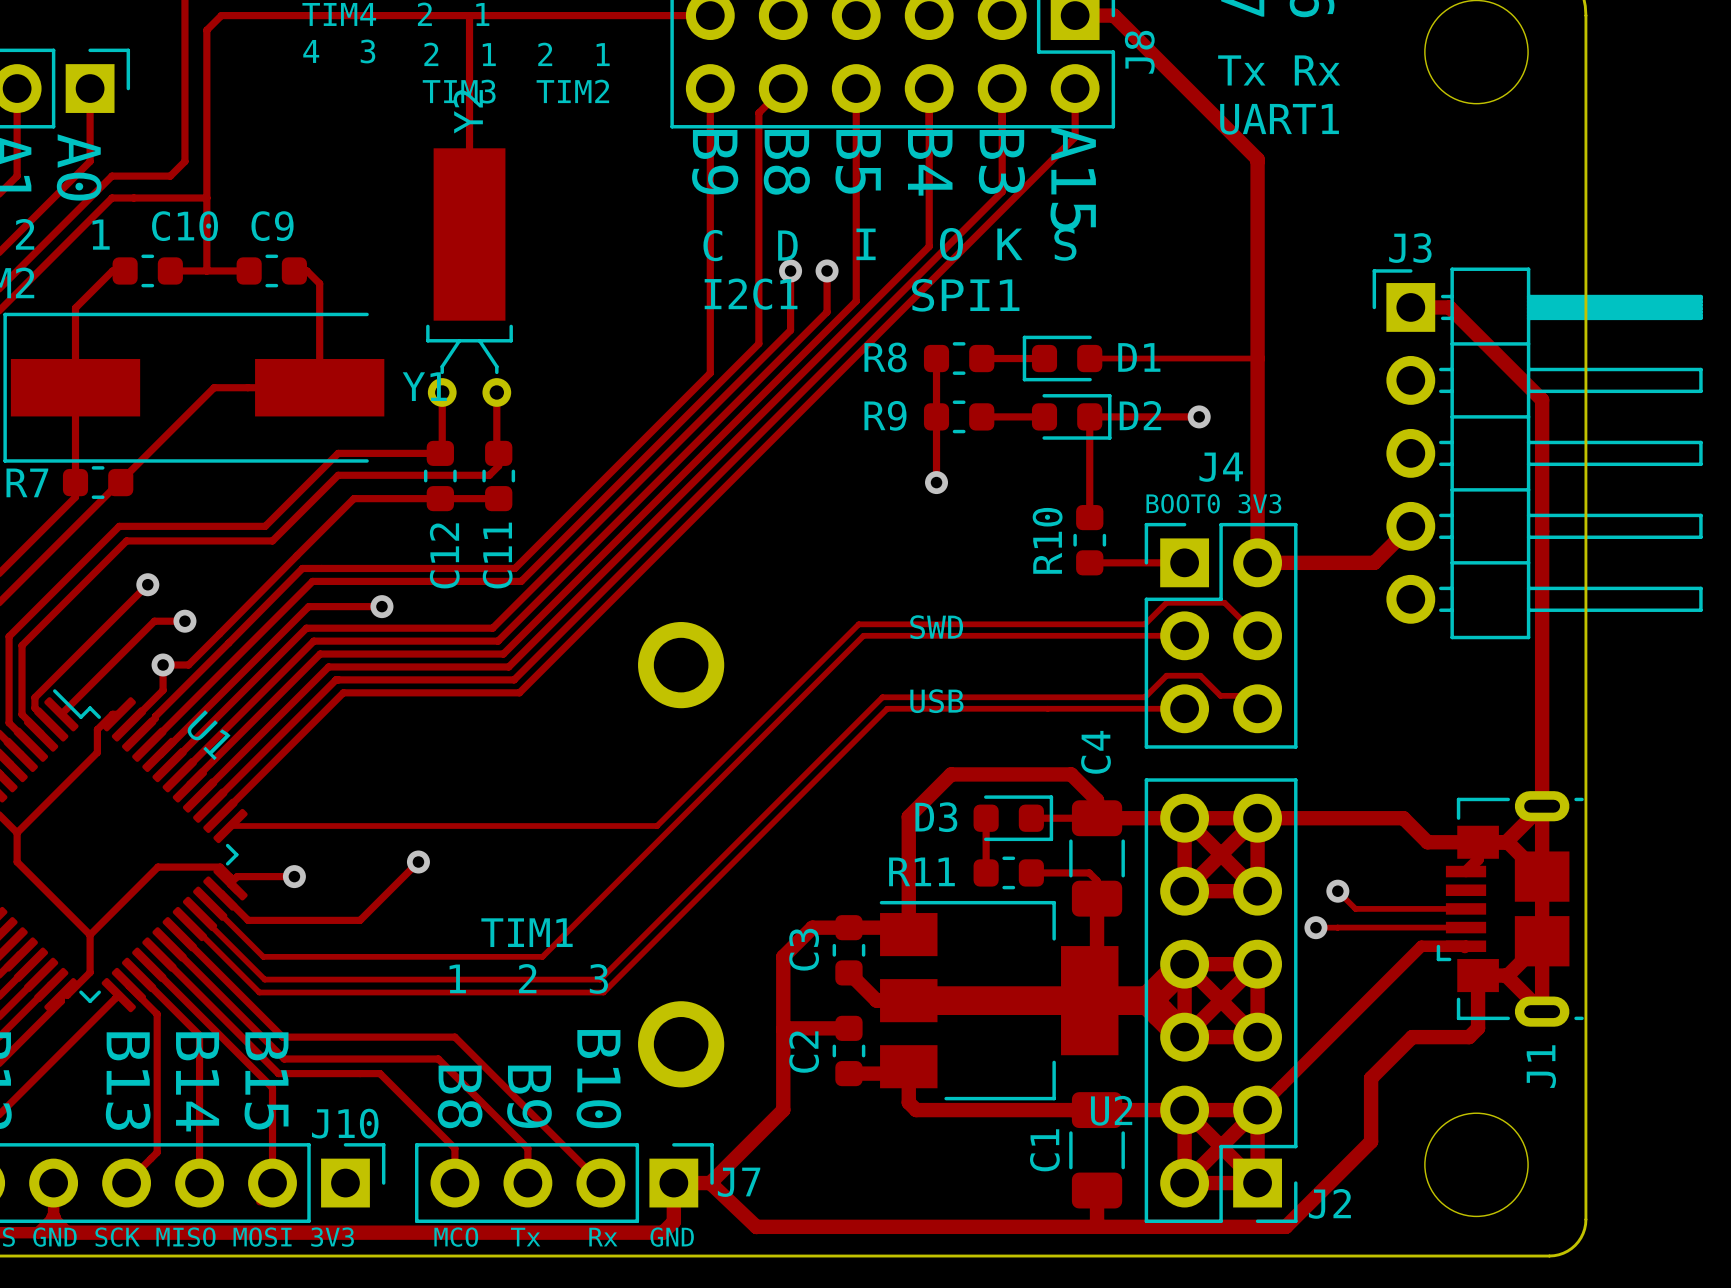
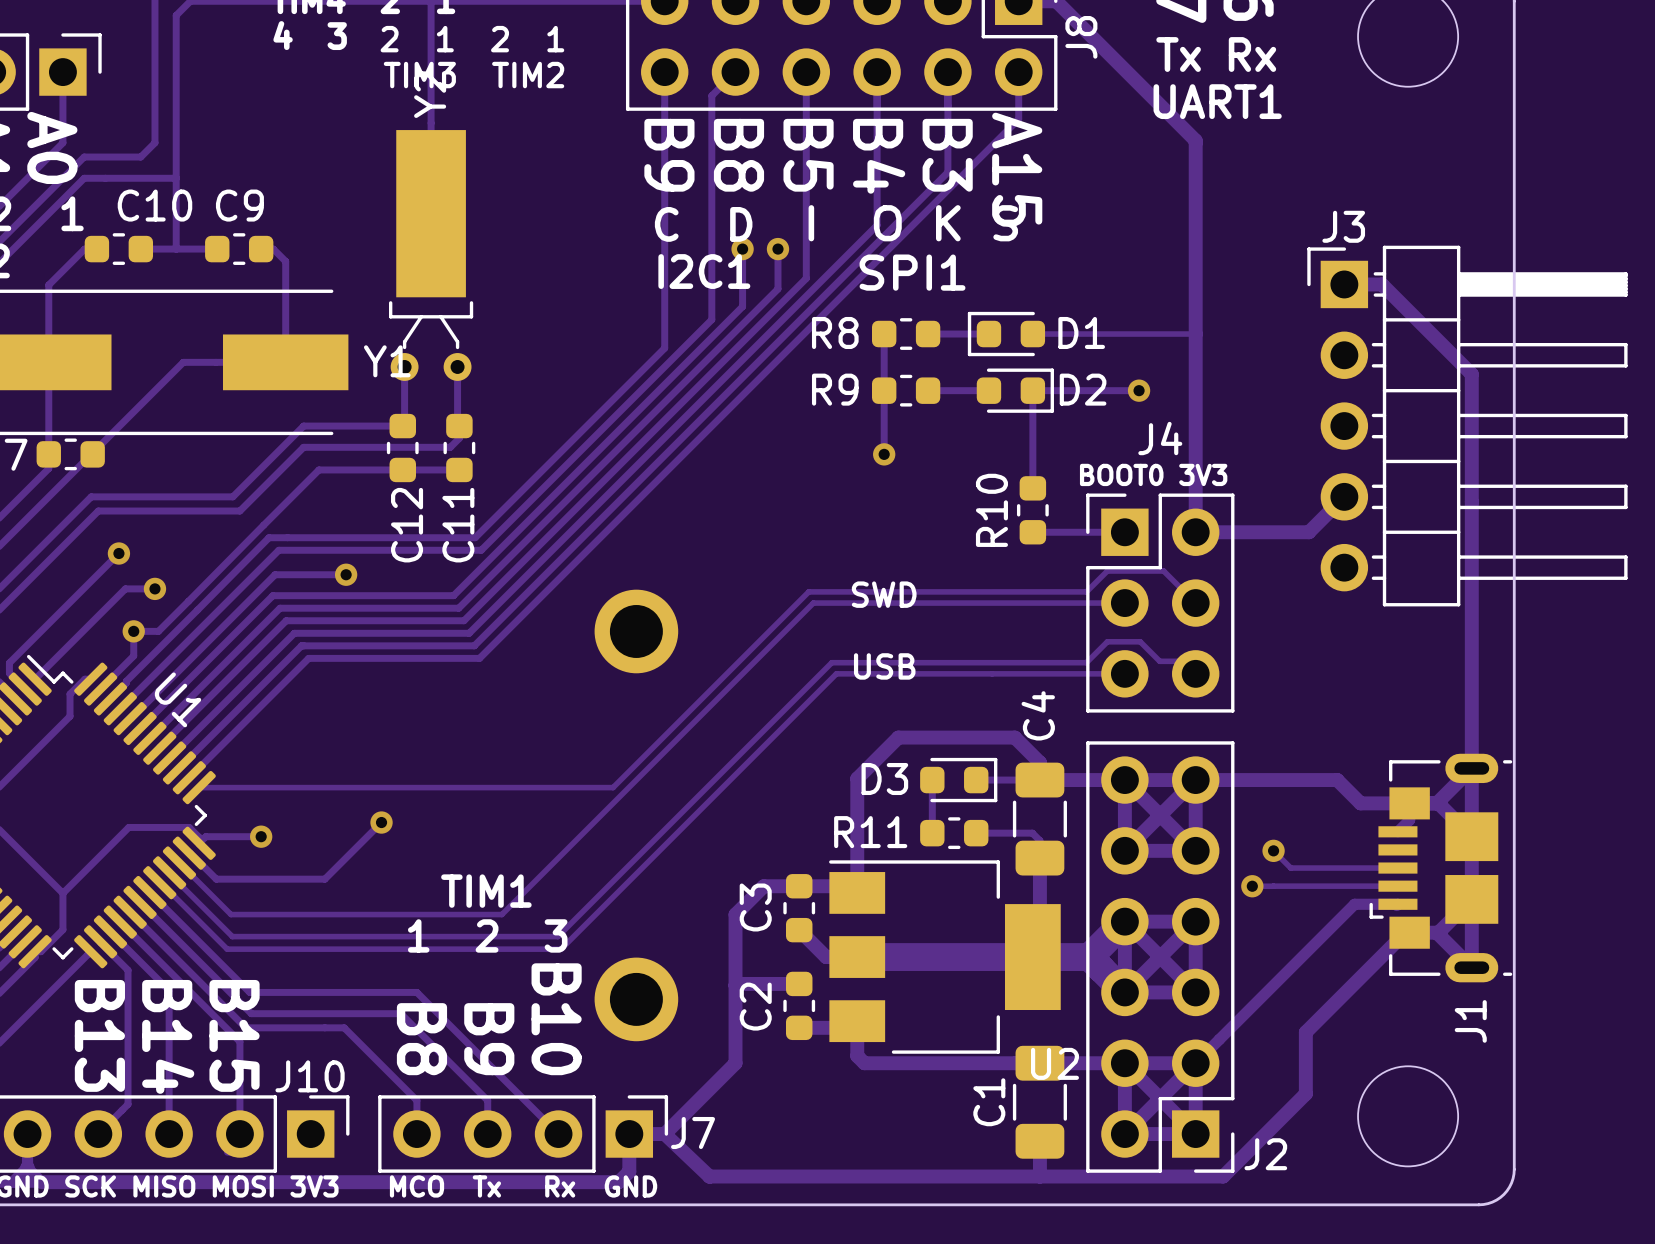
track: (1478, 975) (1478, 1028) (1469, 1037) (1412, 1037) -> (1405, 932) (1345, 992)

